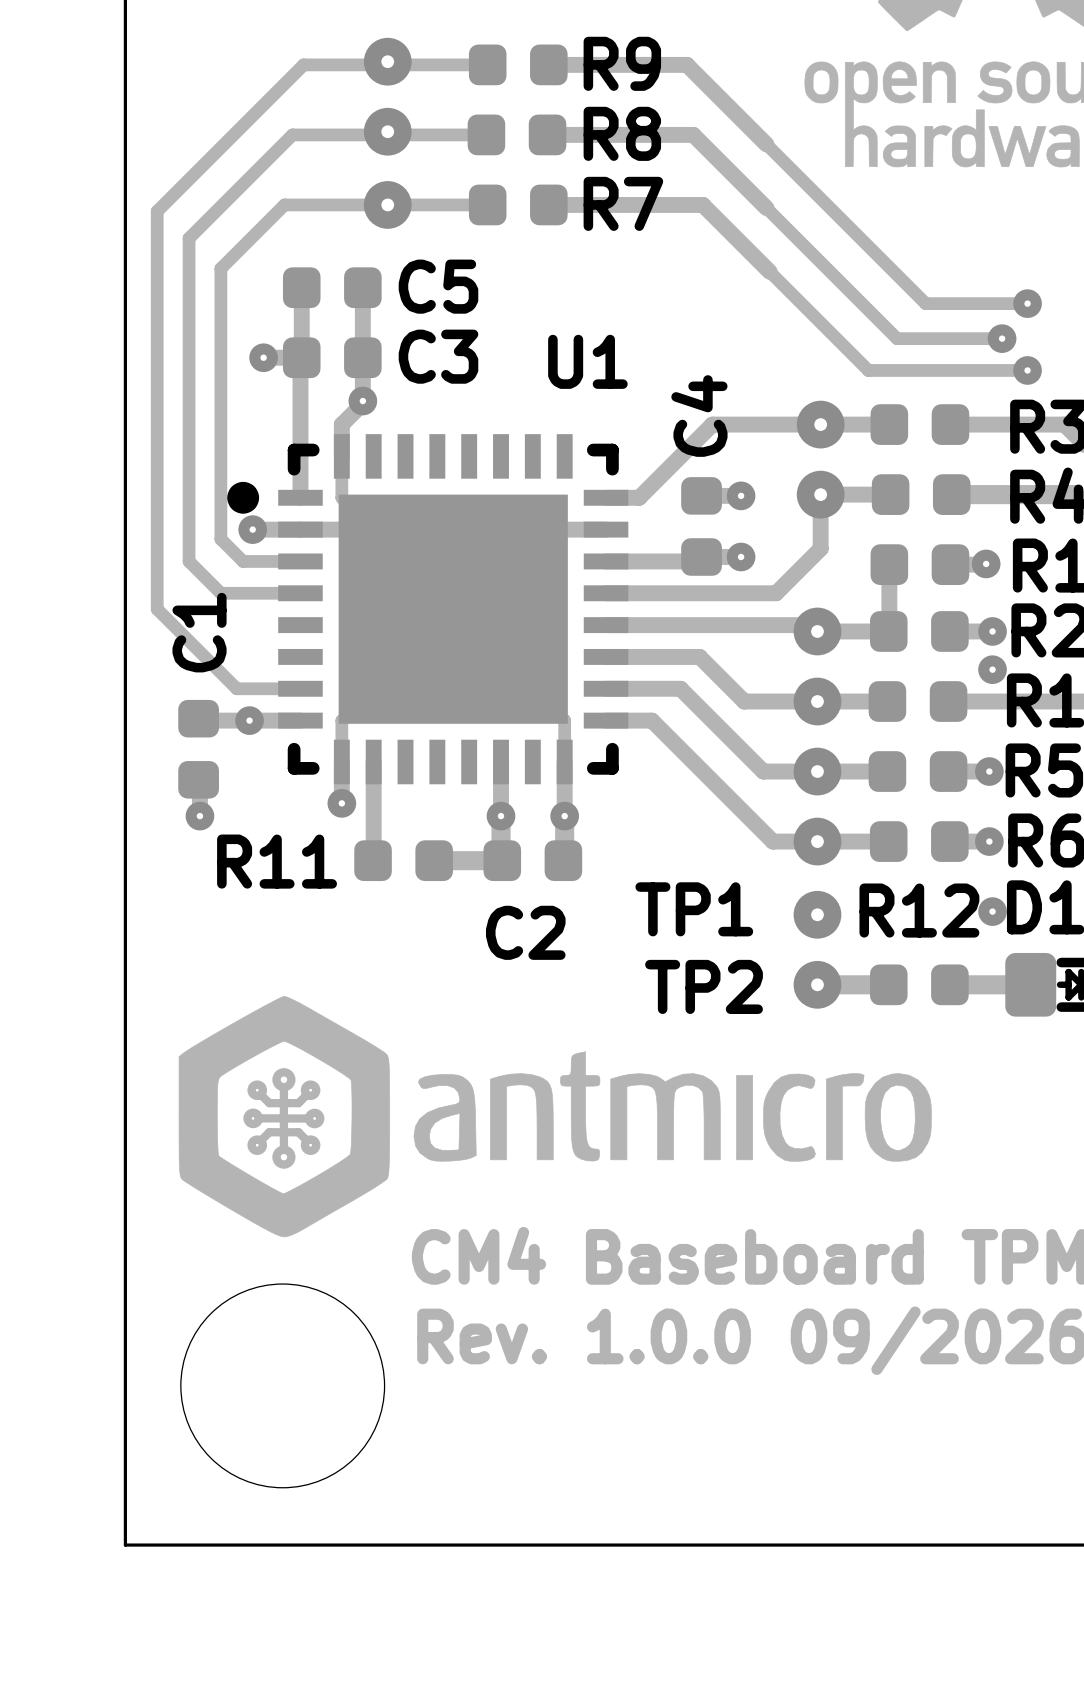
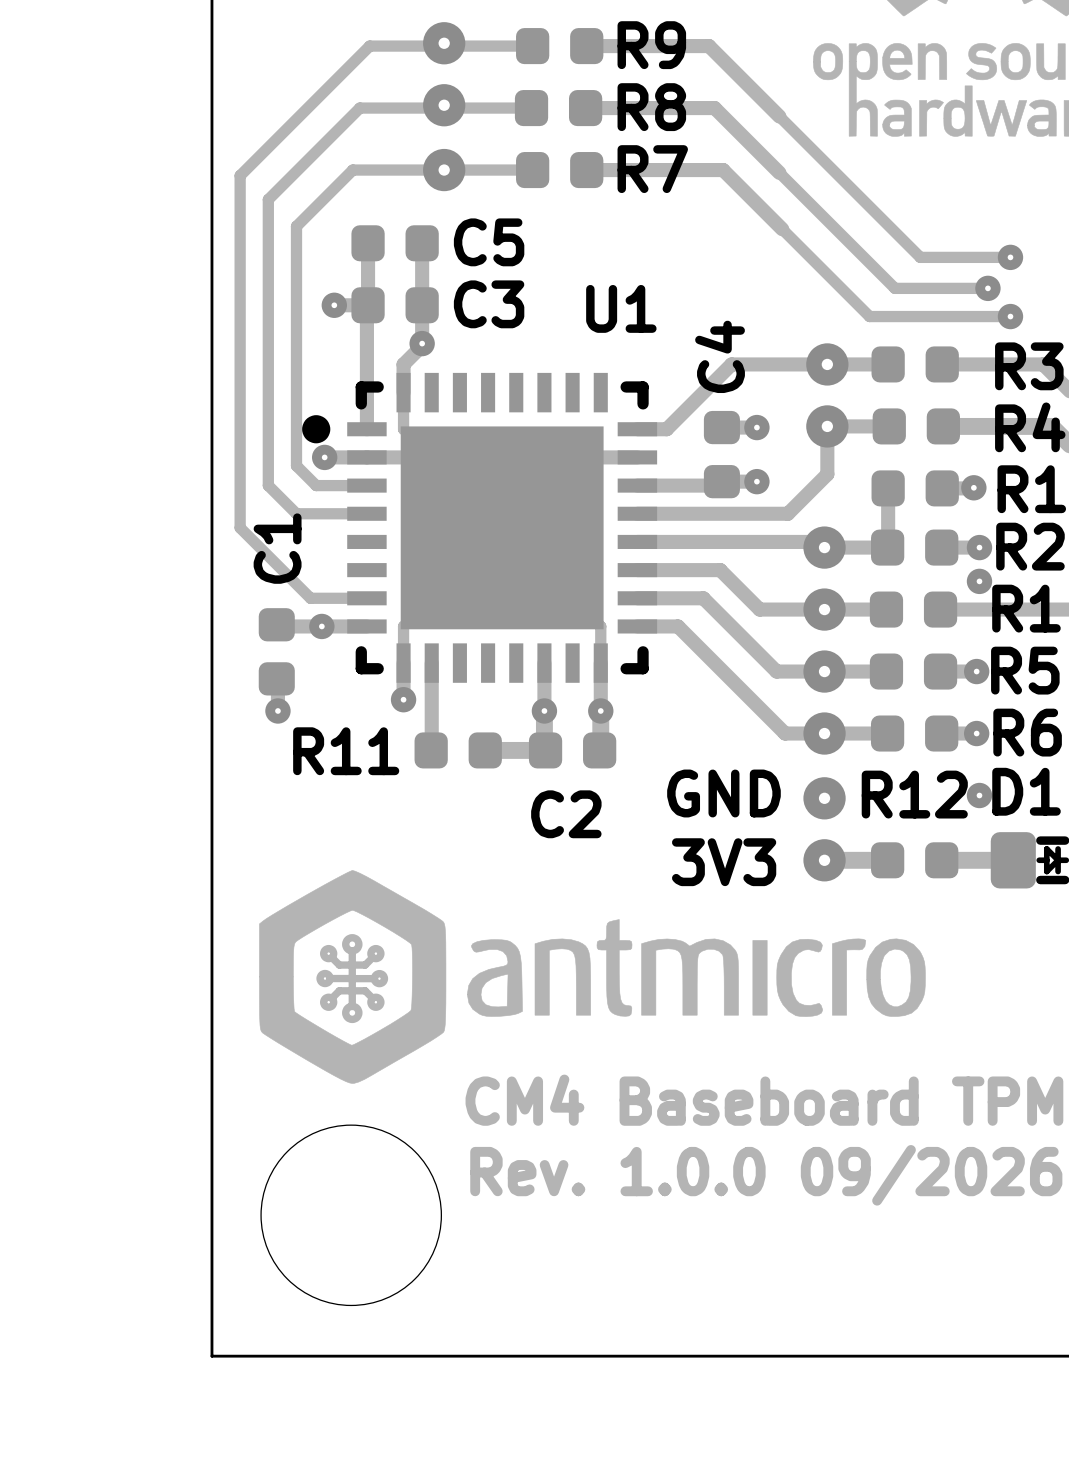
TP1 name: TP1 (694, 909) -> GND (723, 793)
TP2 name: TP2 (704, 986) -> 3V3 (724, 862)

